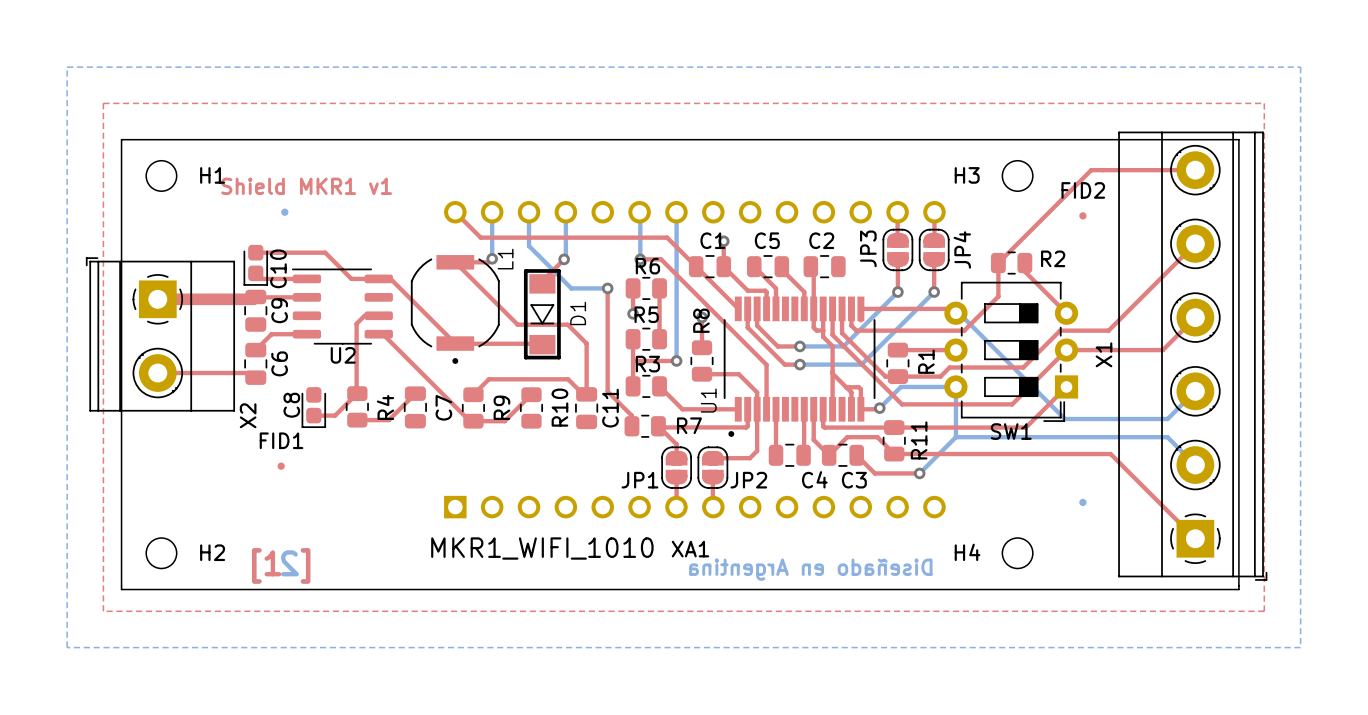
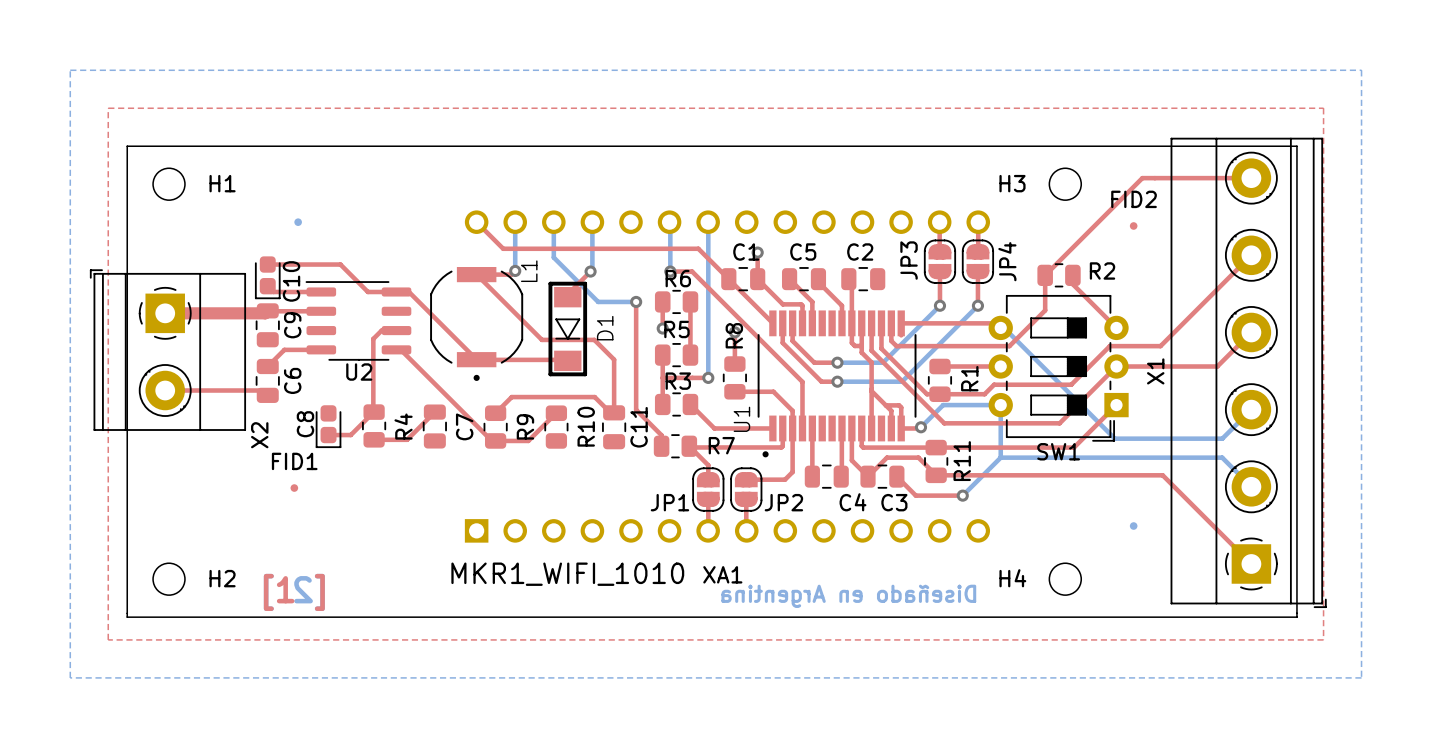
text: Shield MKR1 v1 (306, 186) -> none

